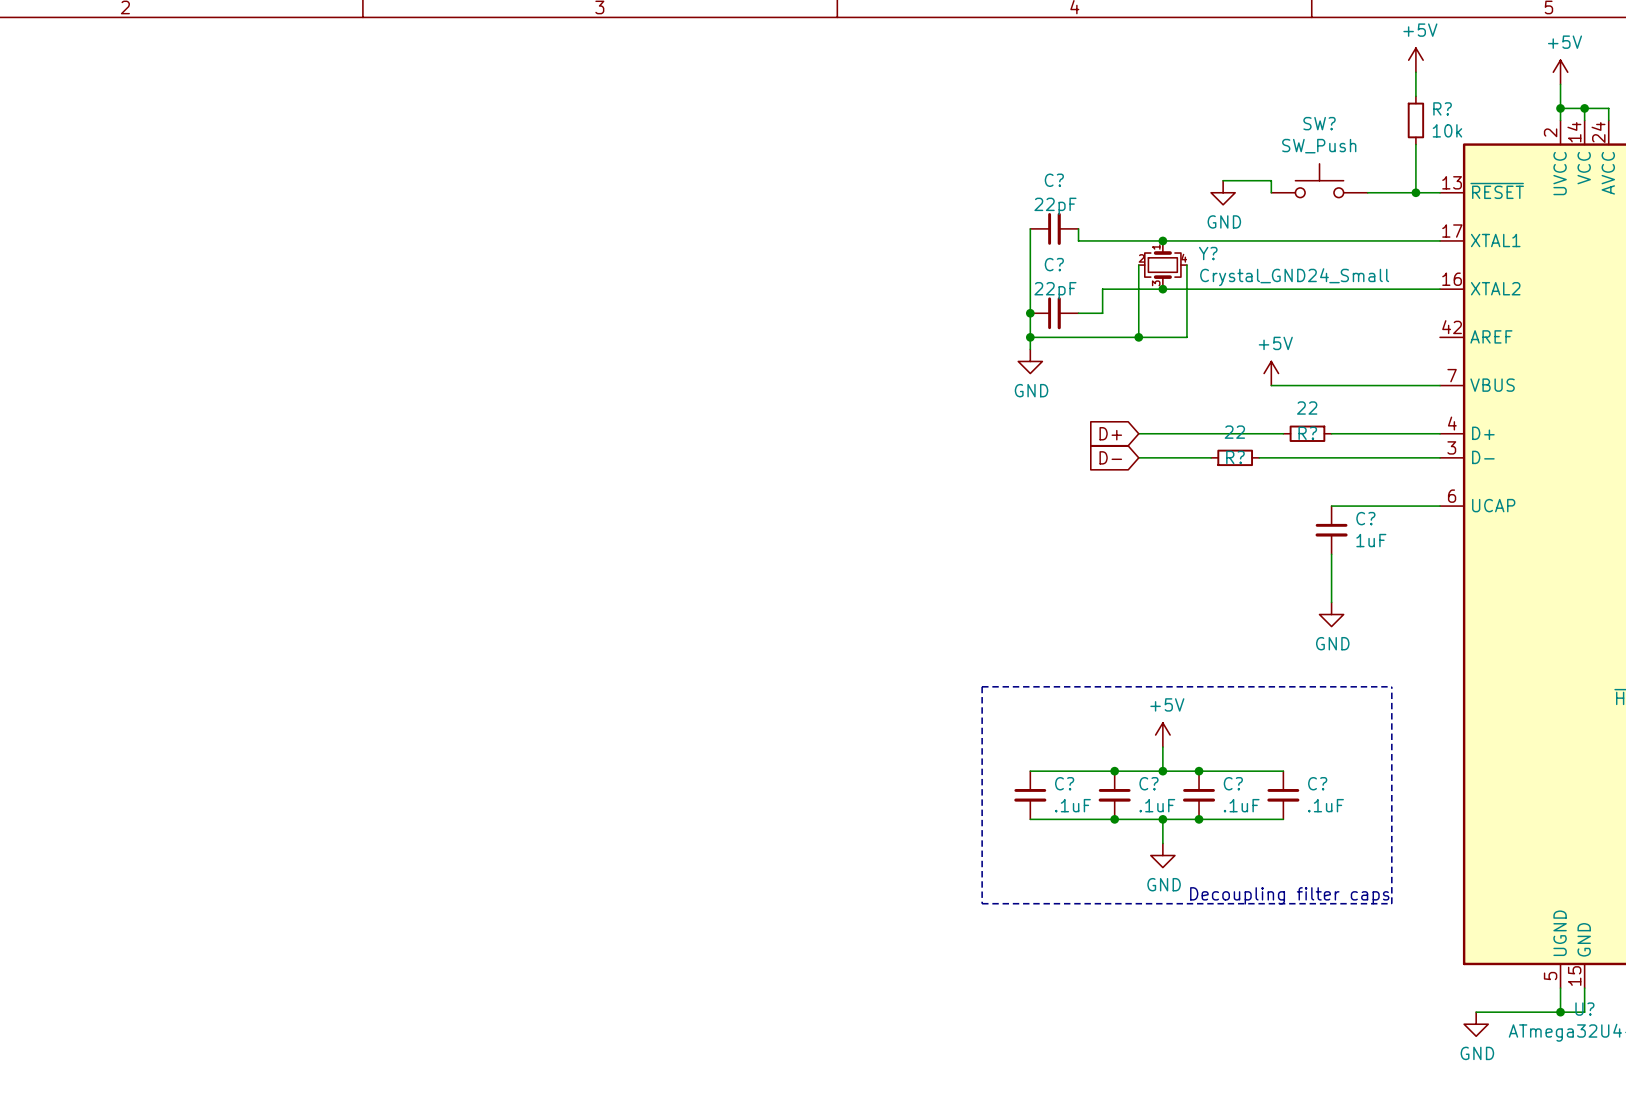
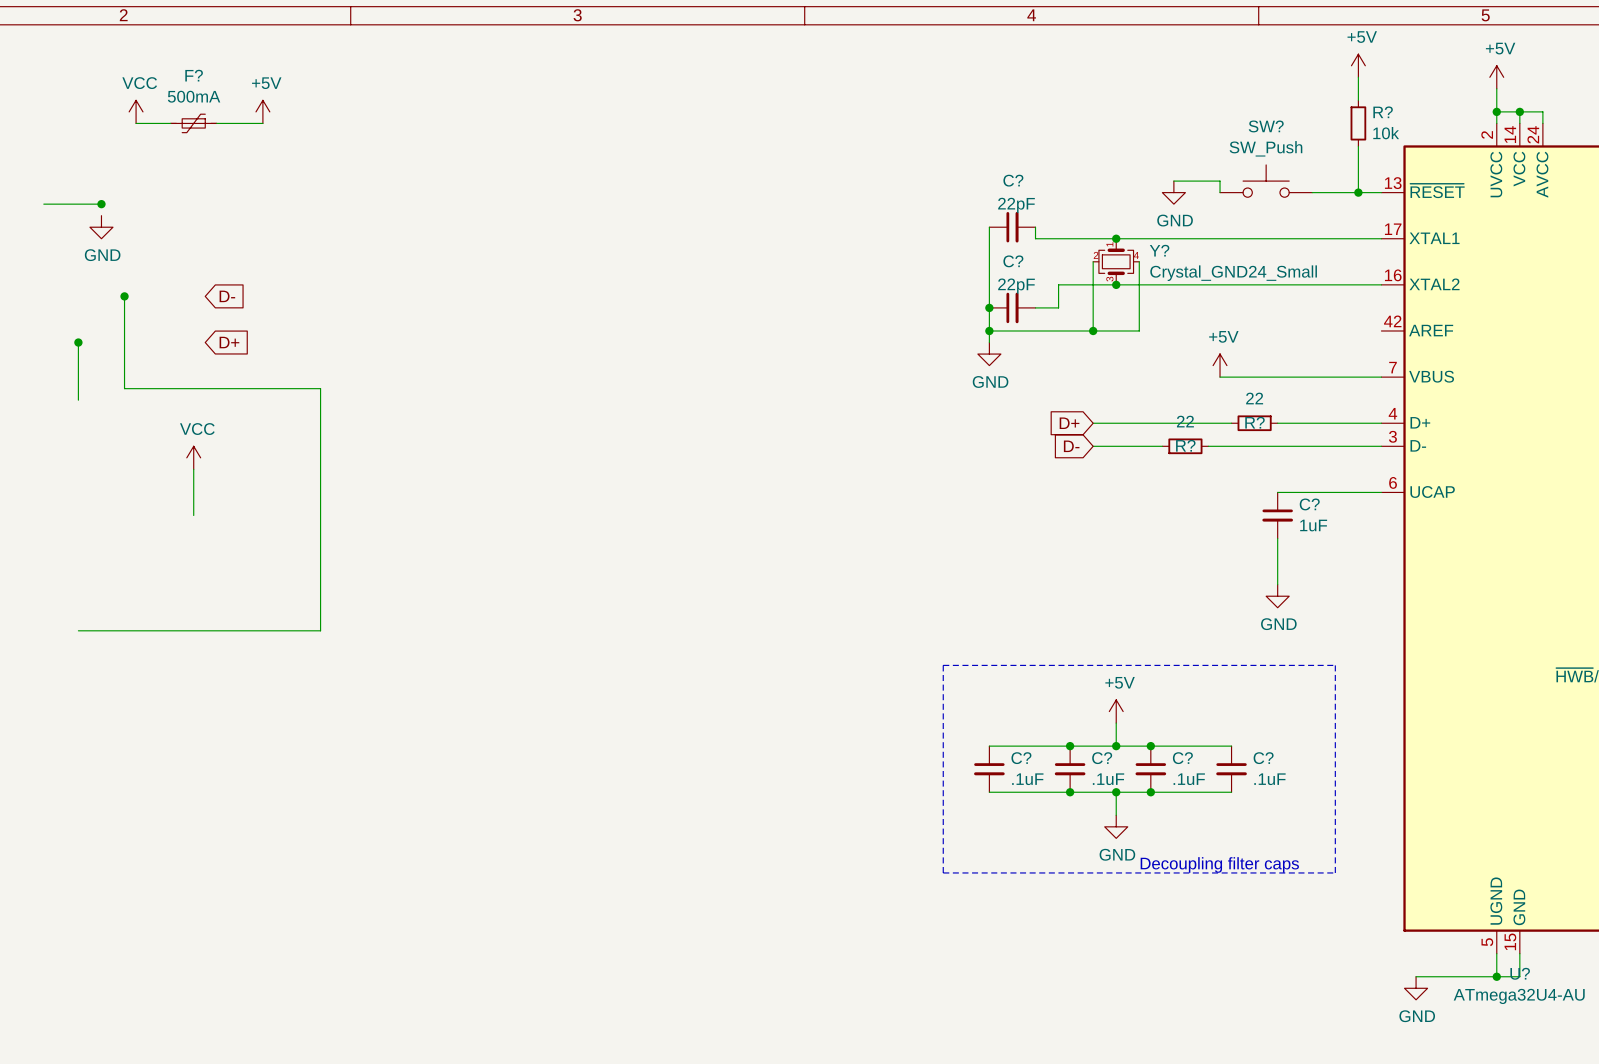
power symbol: none -> VCC (136, 111)
power symbol: none -> +5V (262, 111)
wire: none -> (136, 123) (170, 123)
F?: none -> 500mA (193, 123)
wire: none -> (216, 123) (262, 123)
wire: none -> (43, 204) (101, 204)
junction: none -> (101, 204)
power symbol: none -> GND (101, 227)
wire: none -> (124, 296) (124, 388) (320, 388) (320, 630) (78, 630)
junction: none -> (124, 296)
global label: none -> D- (227, 296)
wire: none -> (78, 342) (78, 400)
junction: none -> (78, 342)
global label: none -> D+ (229, 342)
power symbol: none -> VCC (193, 457)
wire: none -> (193, 469) (193, 515)

